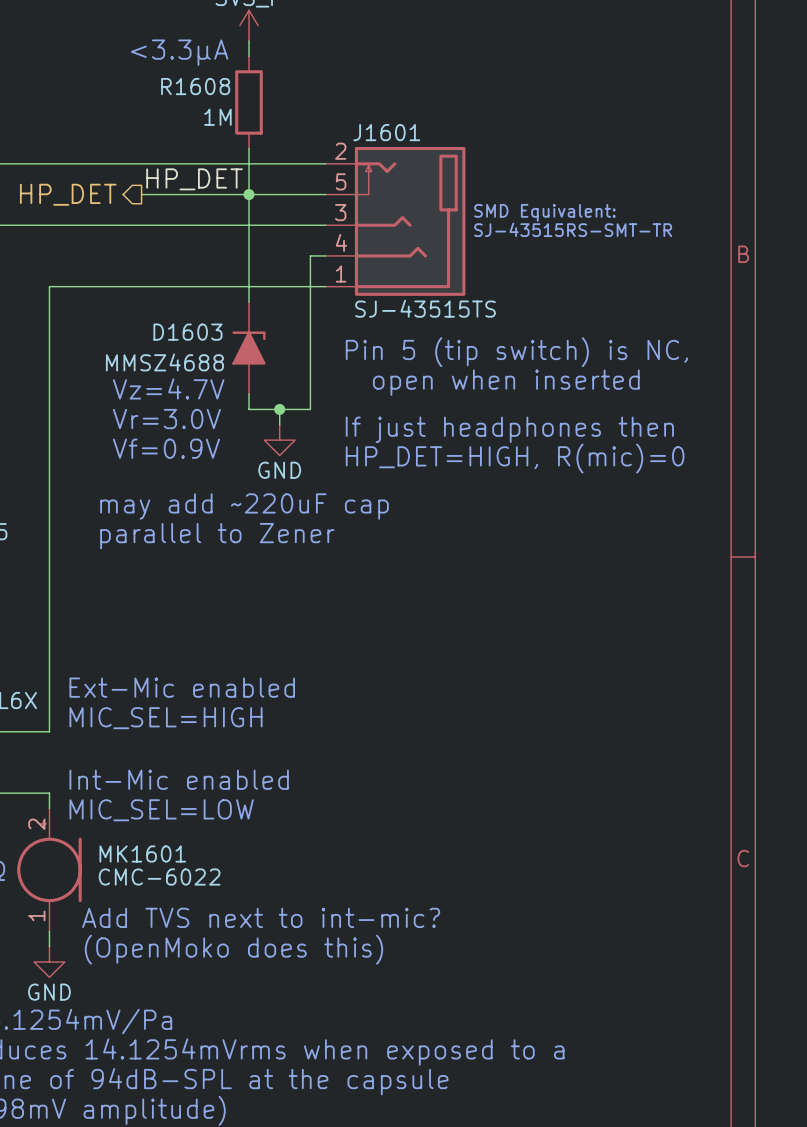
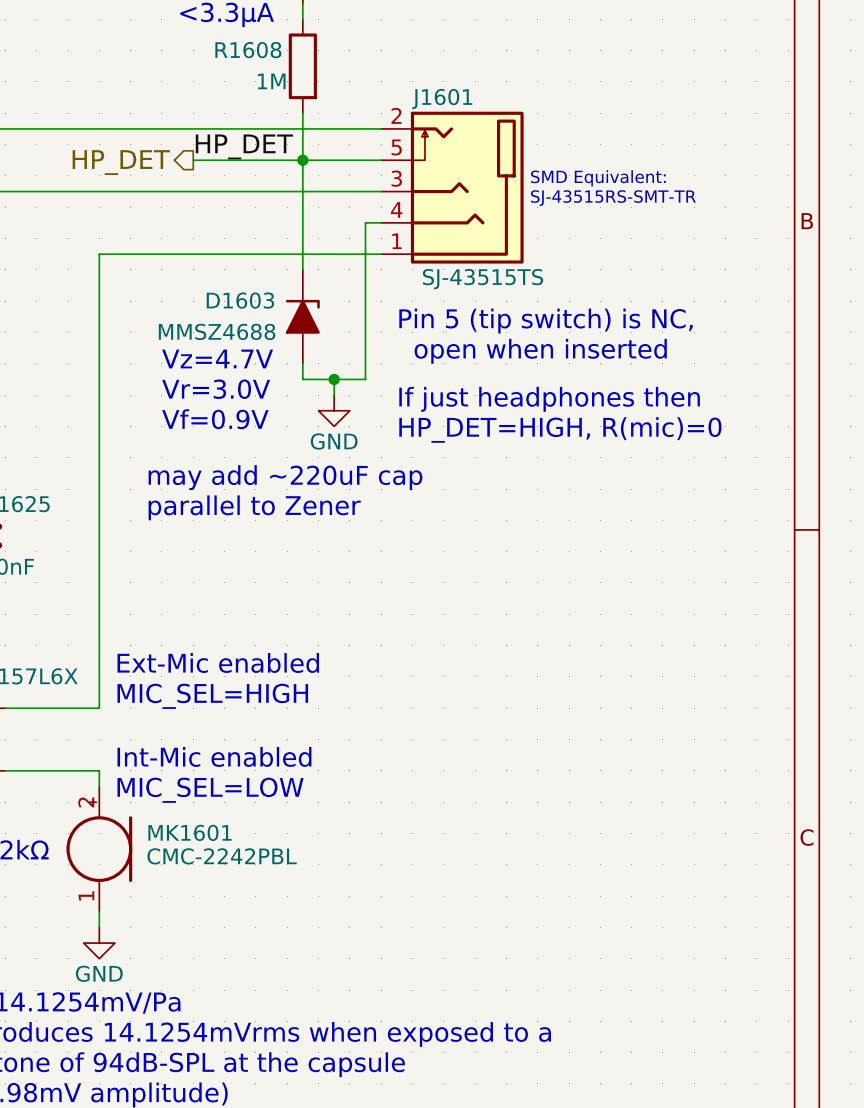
MK1601 value: CMC-6022 (159, 877) -> CMC-2242PBL (222, 856)
text: Add TVS next to int-mic? (261, 917) -> none
text: (OpenMoko does this) (233, 949) -> none

